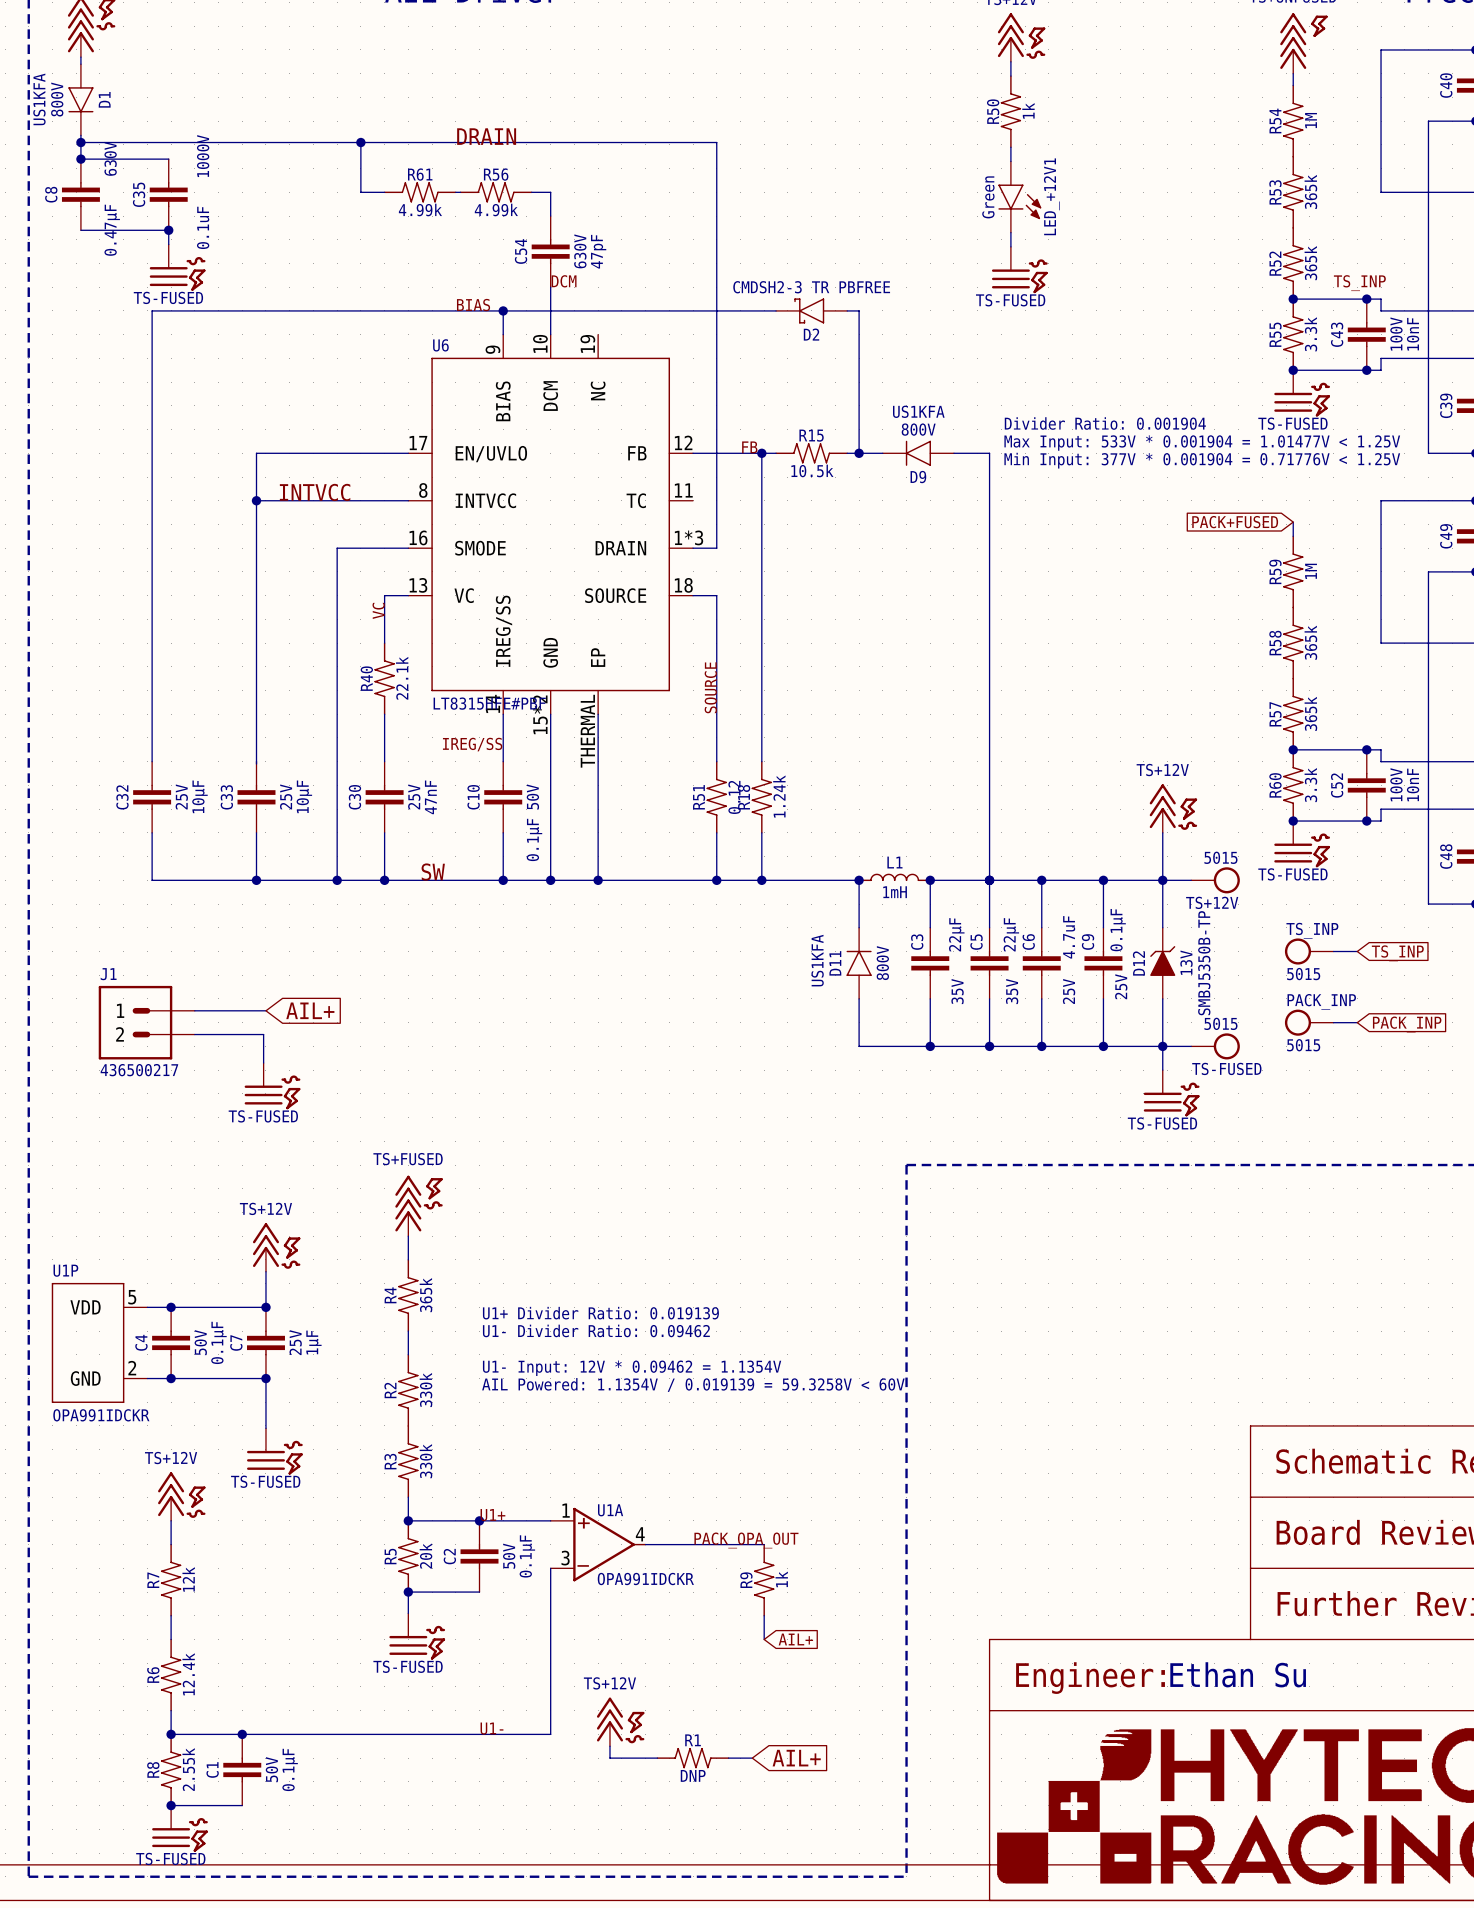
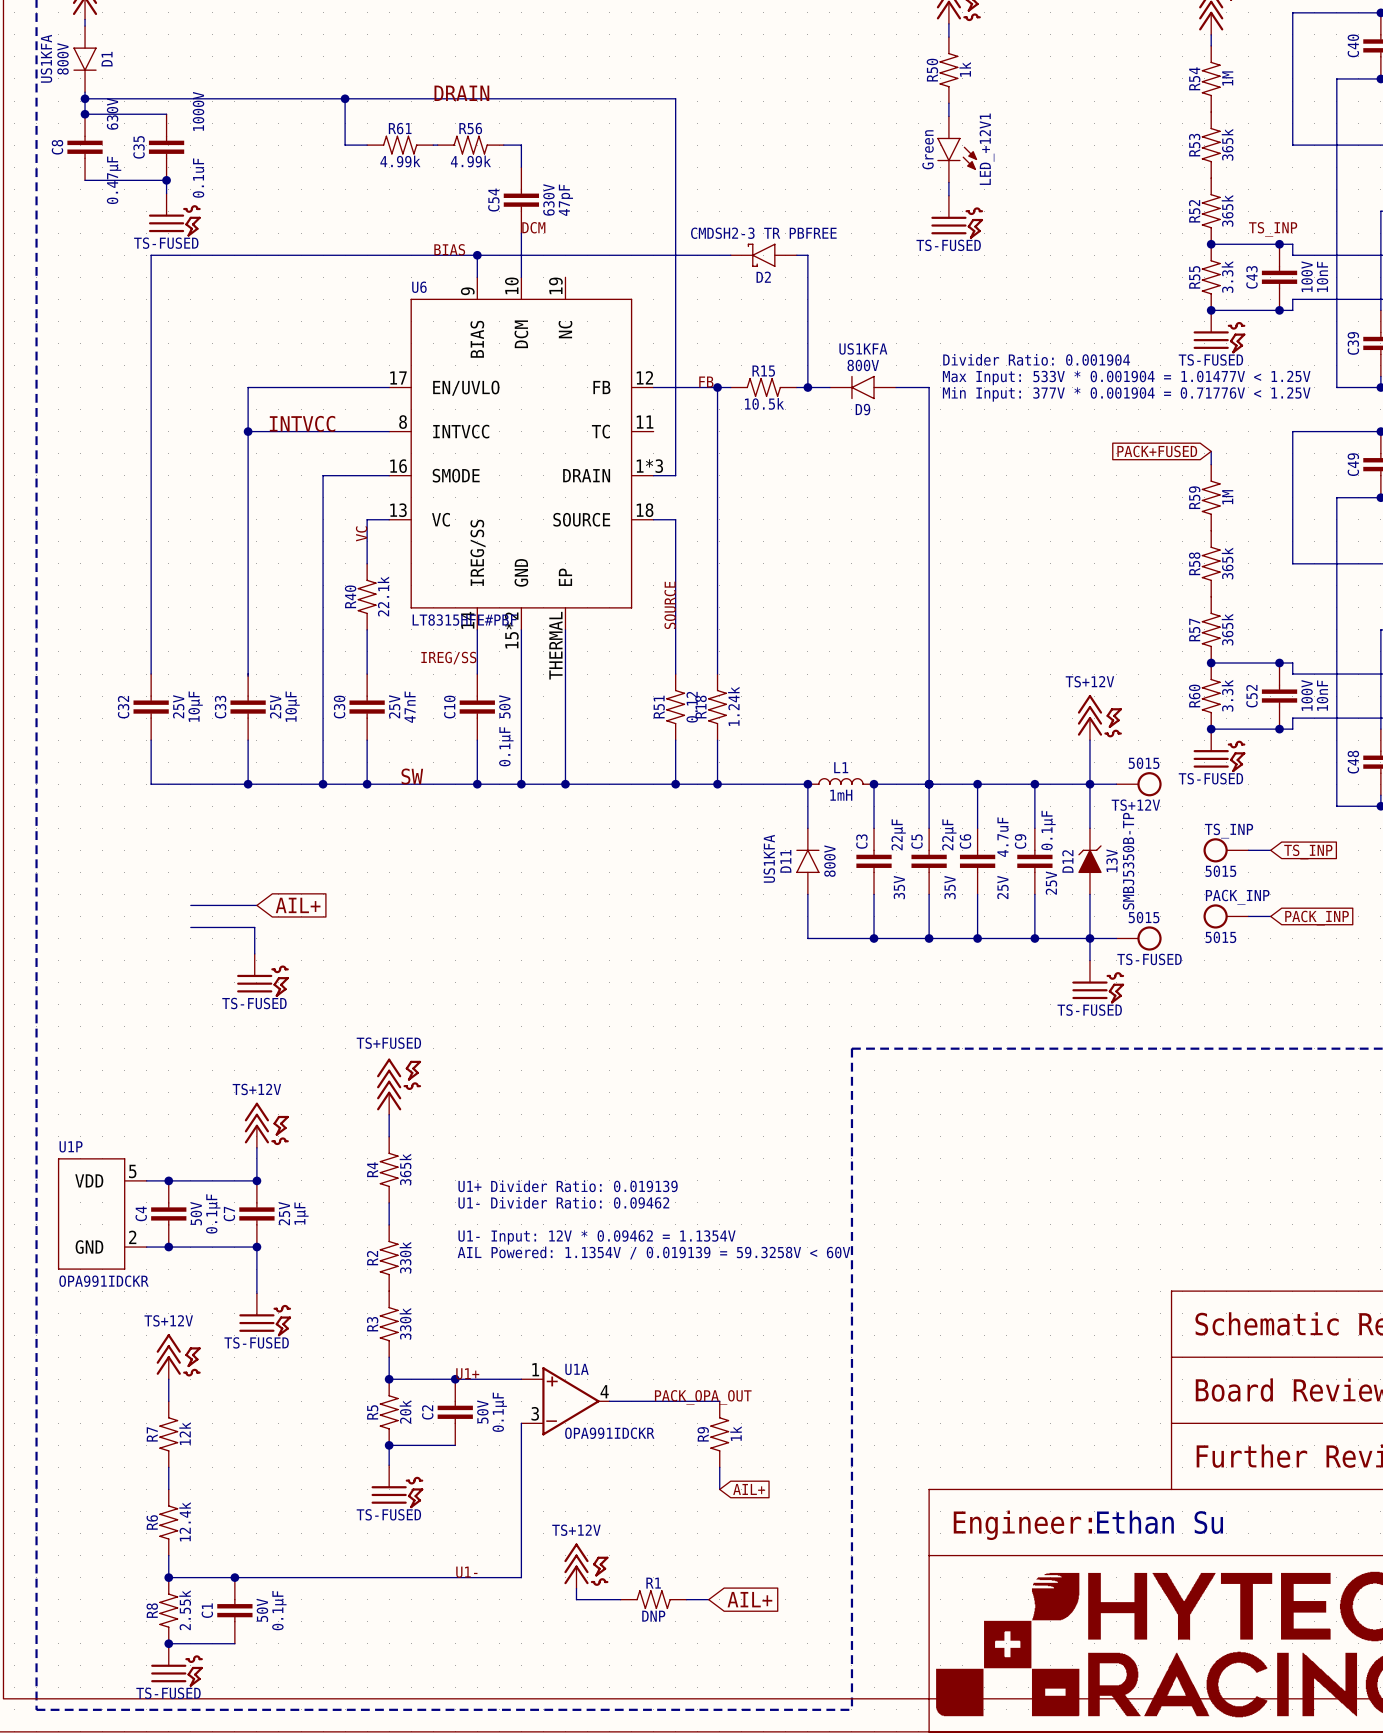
J1: (146, 1022) -> none

